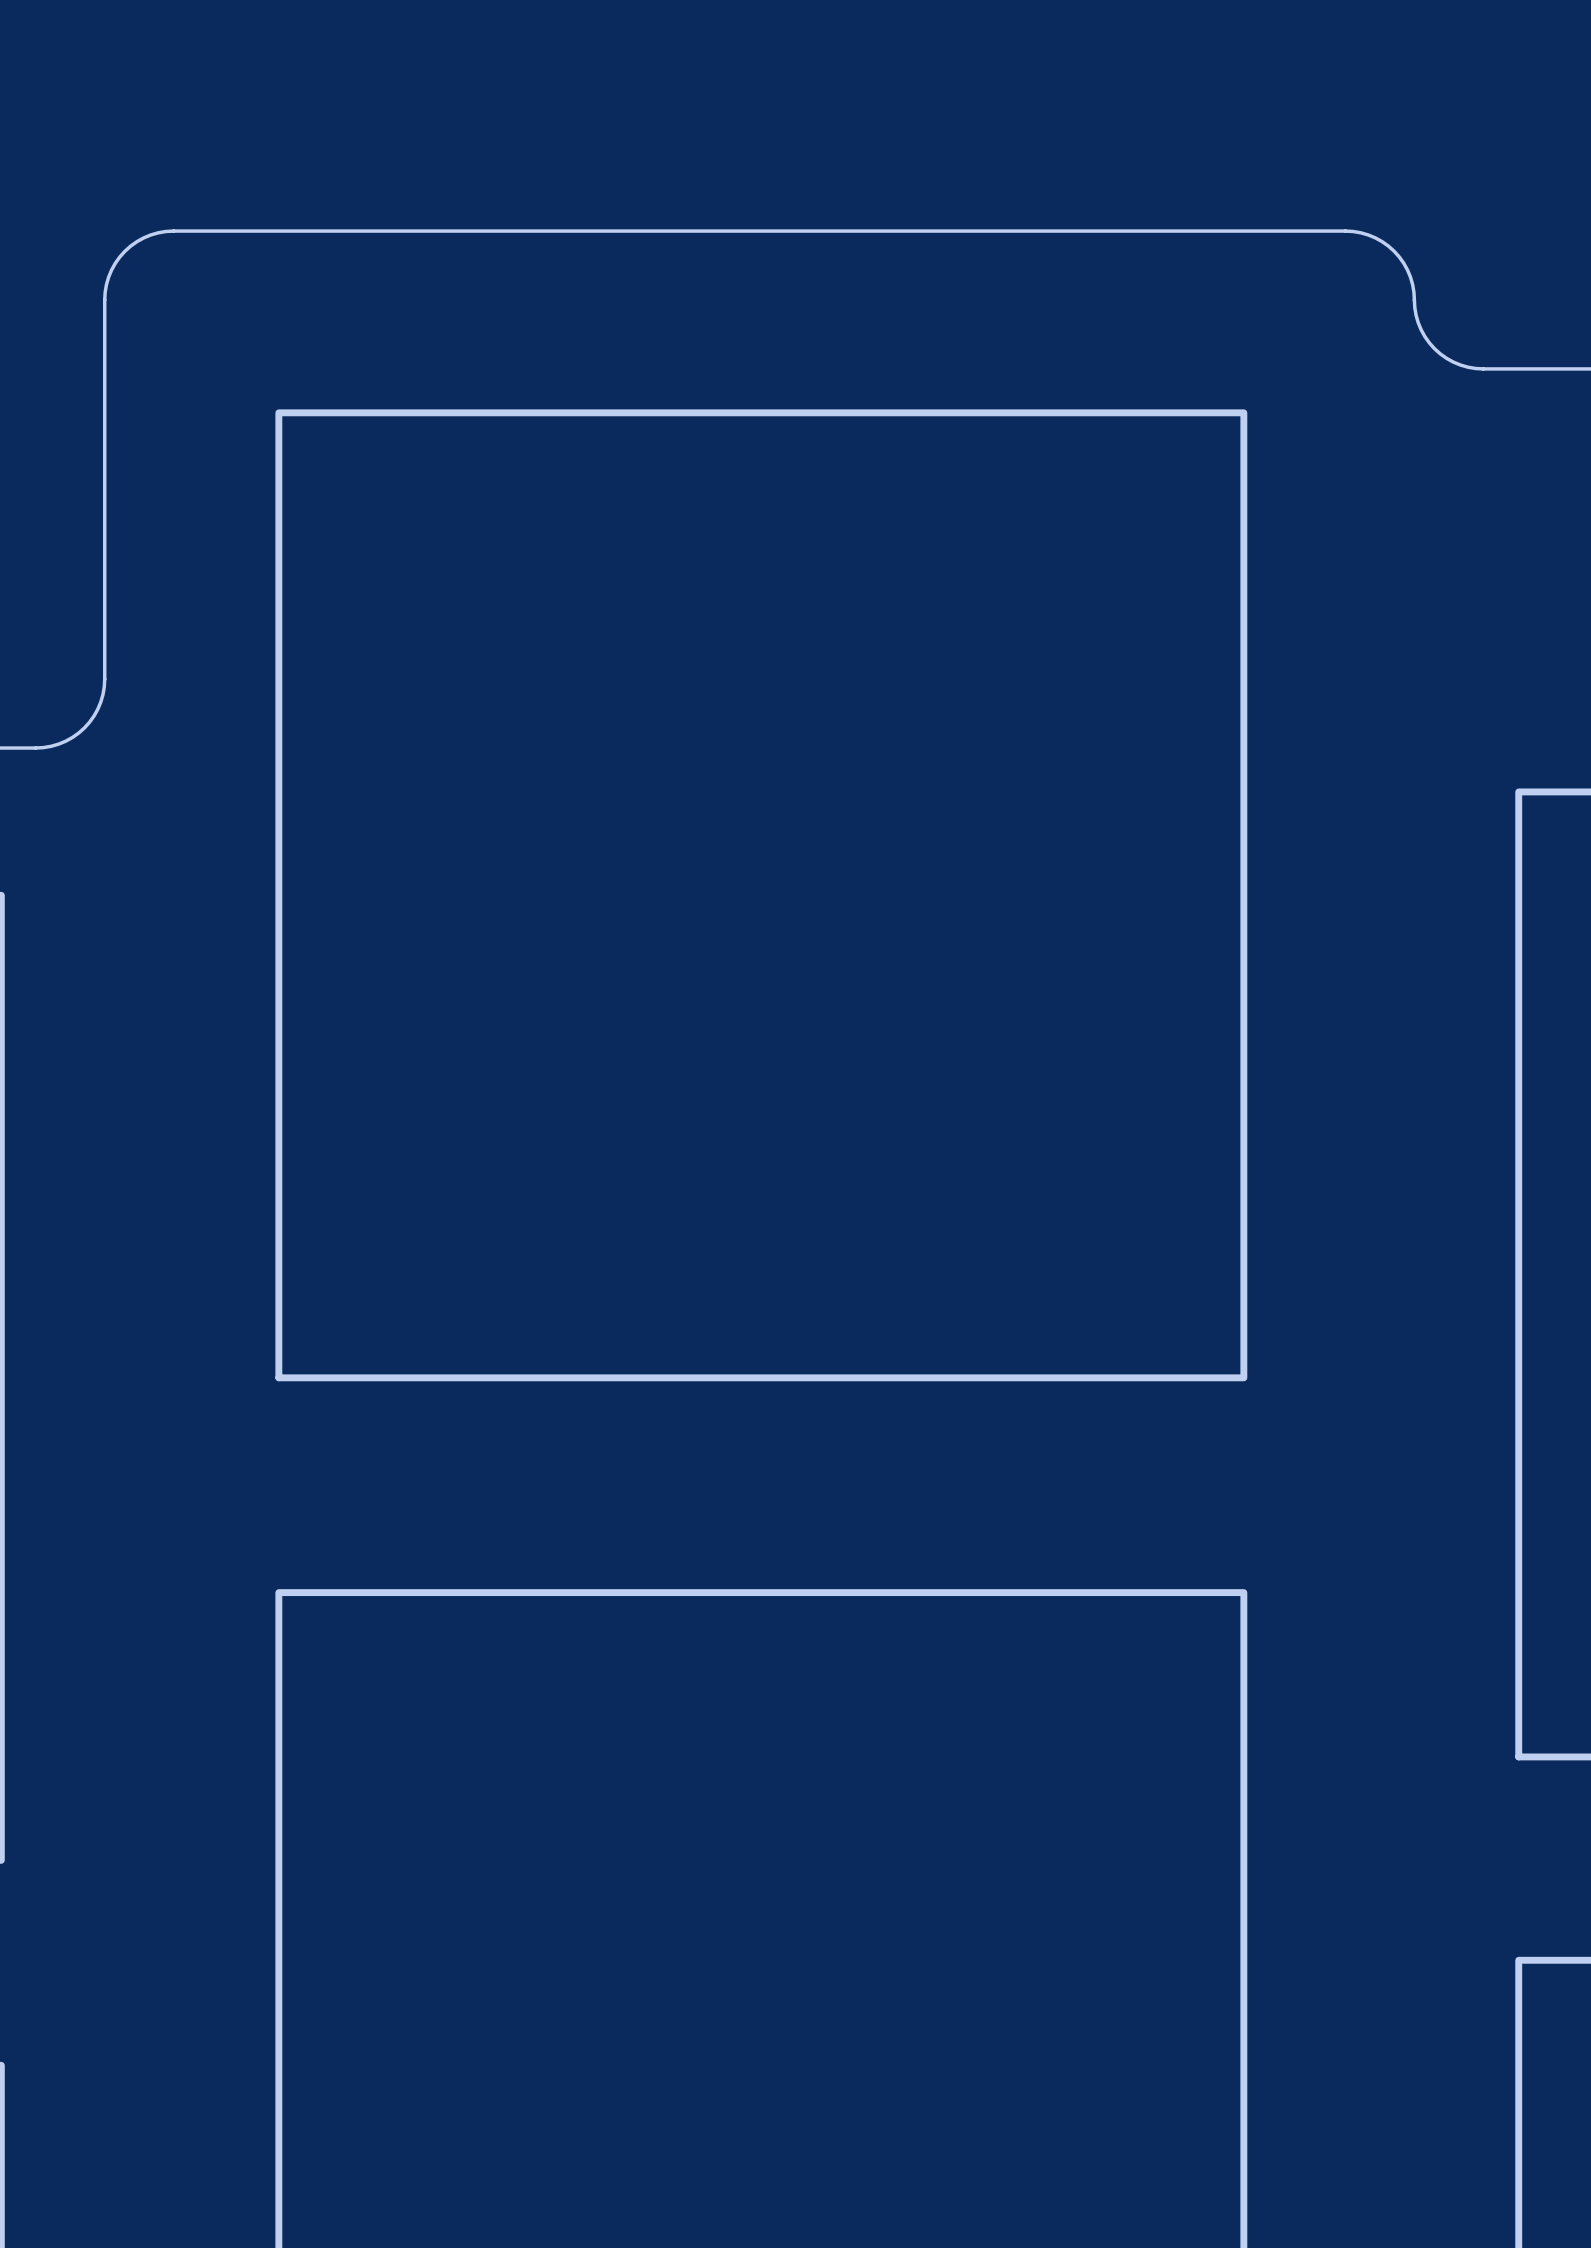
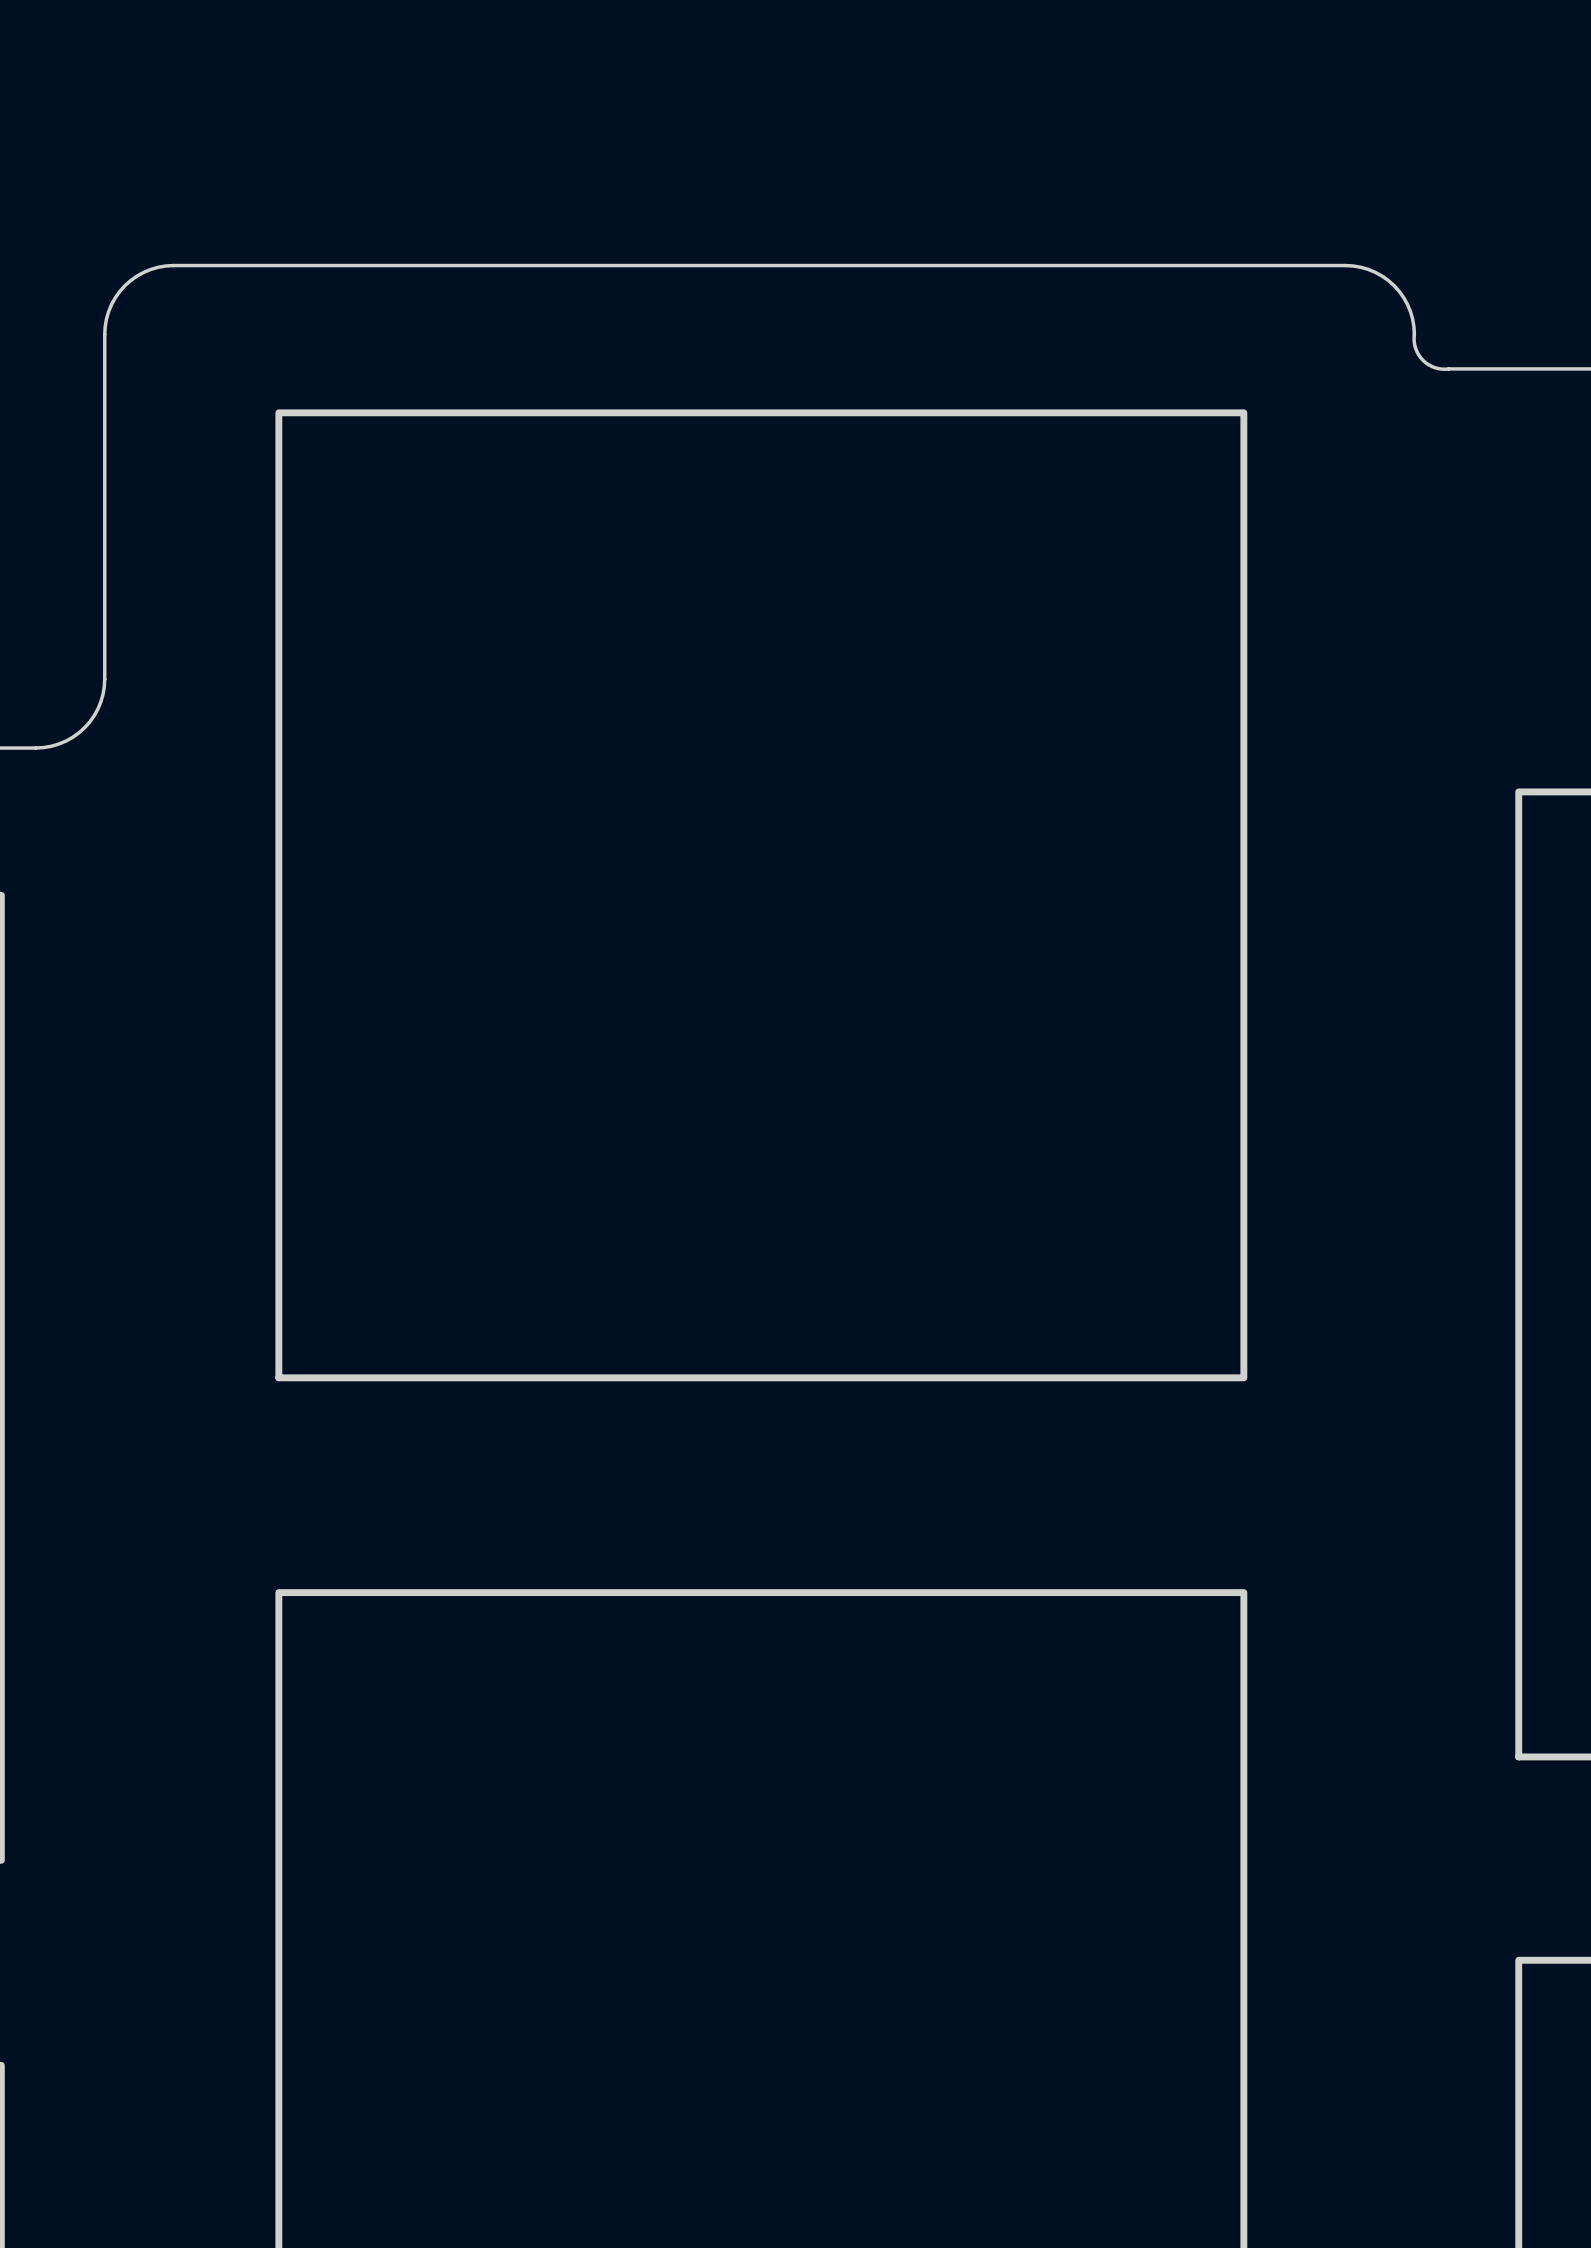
board edge: (104, 334) (105, 292) (108, 277) (115, 263) (124, 251) (136, 241) (150, 234) (165, 231) (1345, 231) (1368, 234) (1382, 241) (1394, 251) (1403, 263) (1410, 277) (1416, 315) (1421, 329) (1429, 342) (1440, 353) (1453, 362) (1467, 367) (1483, 368) -> (104, 334) (106, 319) (111, 304) (124, 285) (136, 276) (150, 269) (173, 265) (1345, 265) (1360, 267) (1375, 272) (1388, 280) (1399, 291) (1407, 304) (1412, 319) (1415, 348) (1425, 362) (1441, 369) (1483, 368)

